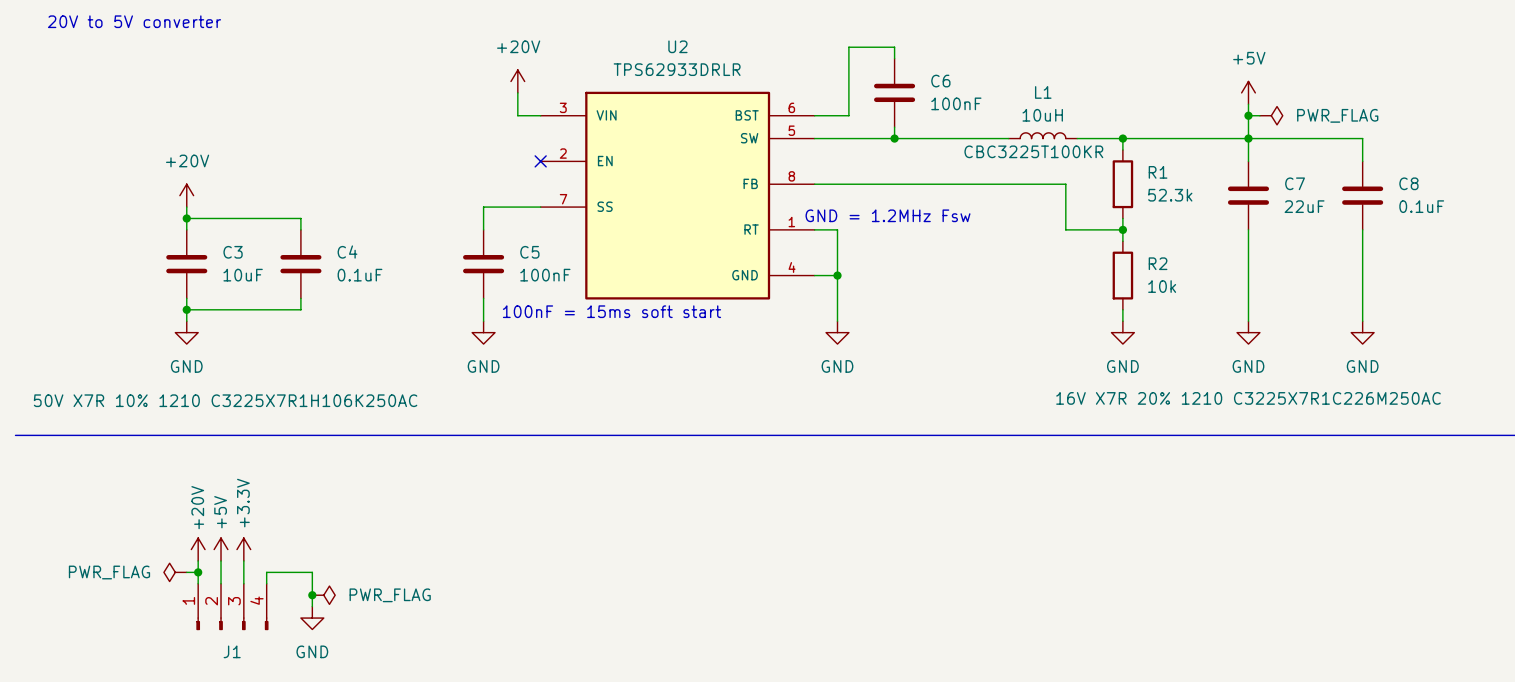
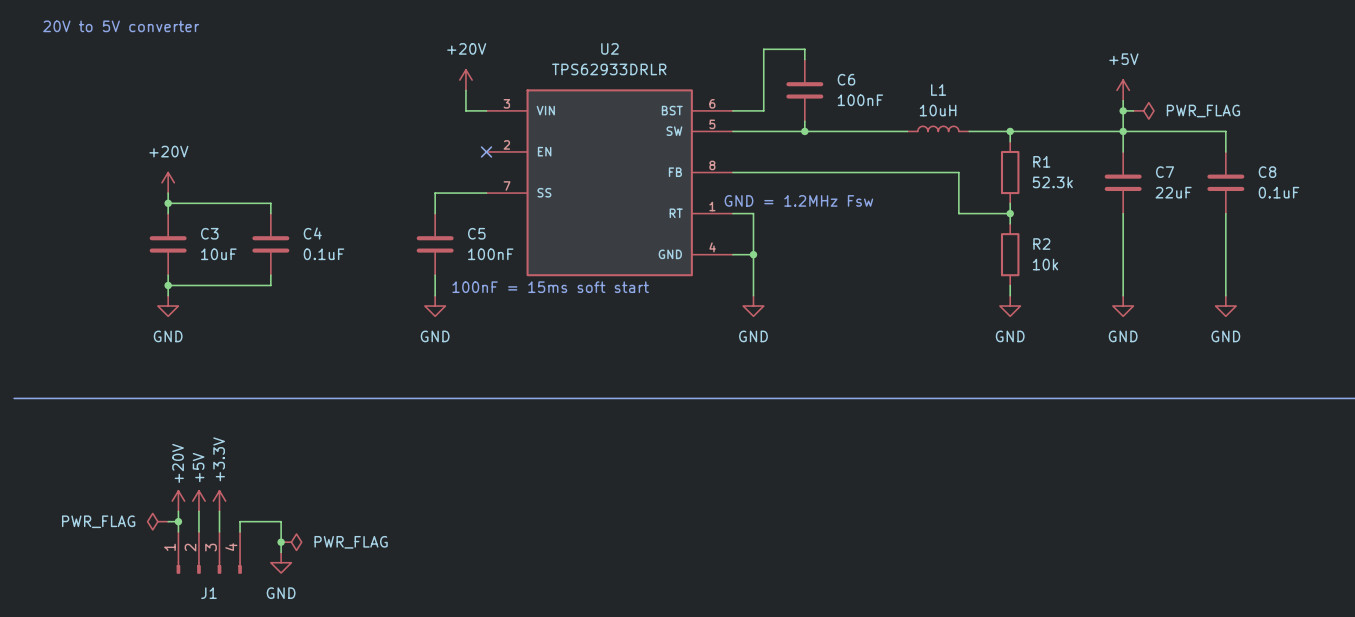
L1 text: CBC3225T100KR (1033, 151) -> none
C7 text: 16V X7R 20% 1210 C3225X7R1C226M250AC (1248, 398) -> none
C3 text: 50V X7R 10% 1210 C3225X7R1H106K250AC (225, 400) -> none

